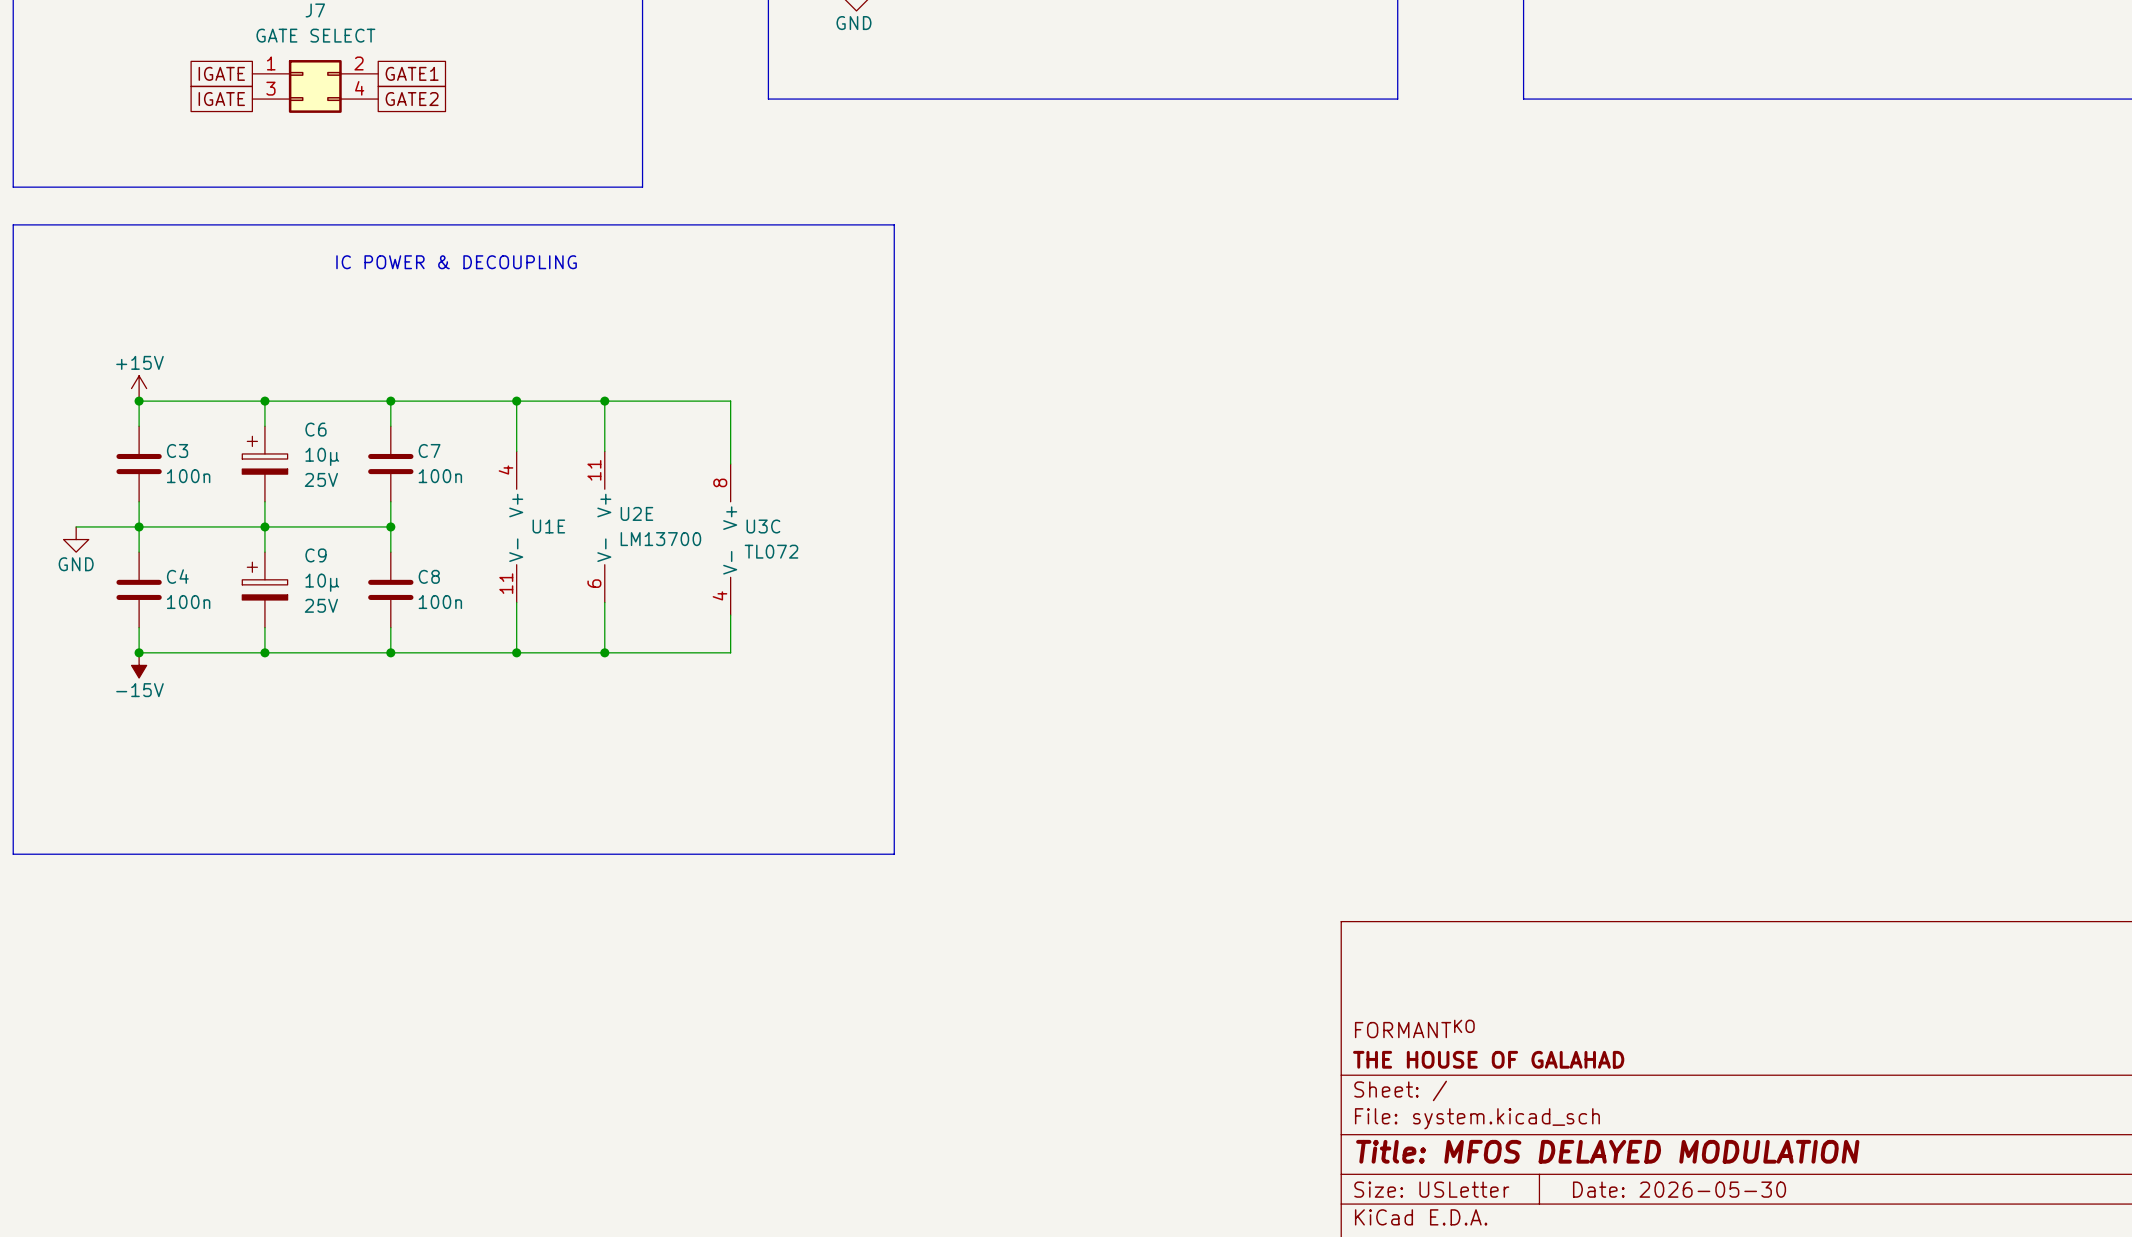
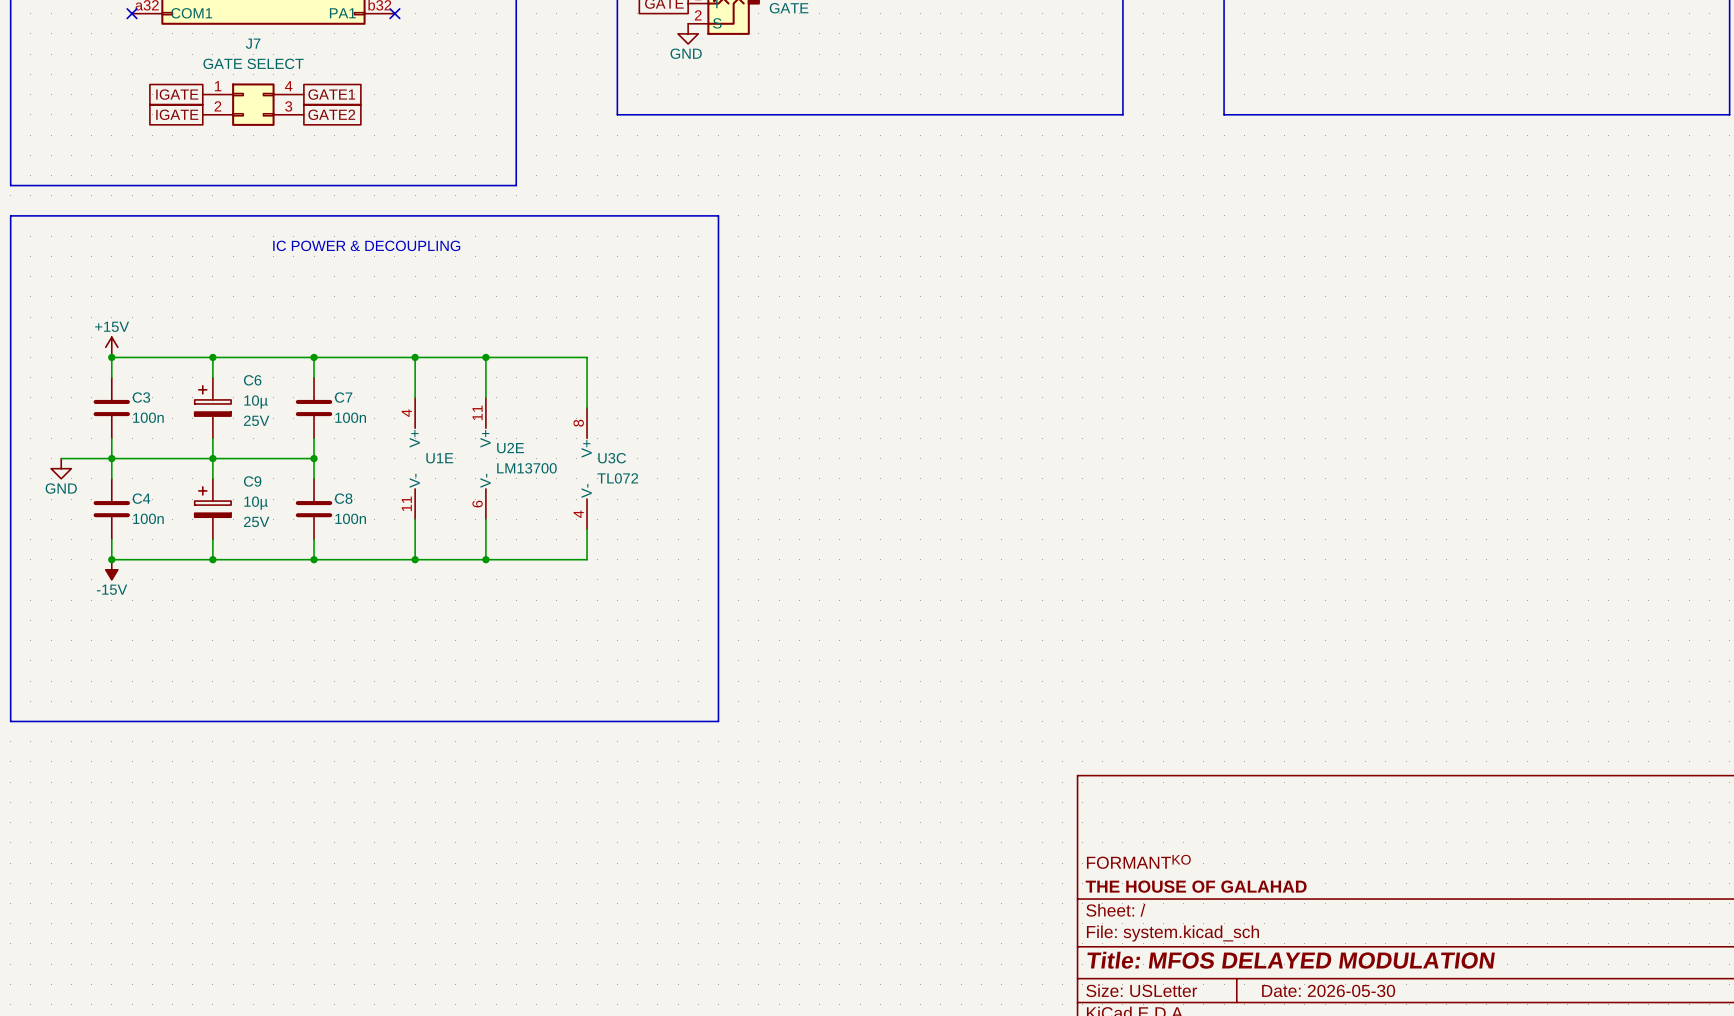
J7 pin number: 2 (359, 63) -> 4 (288, 86)
J7 pin number: 3 (270, 88) -> 2 (217, 106)
J7 pin number: 4 (359, 88) -> 3 (288, 106)

